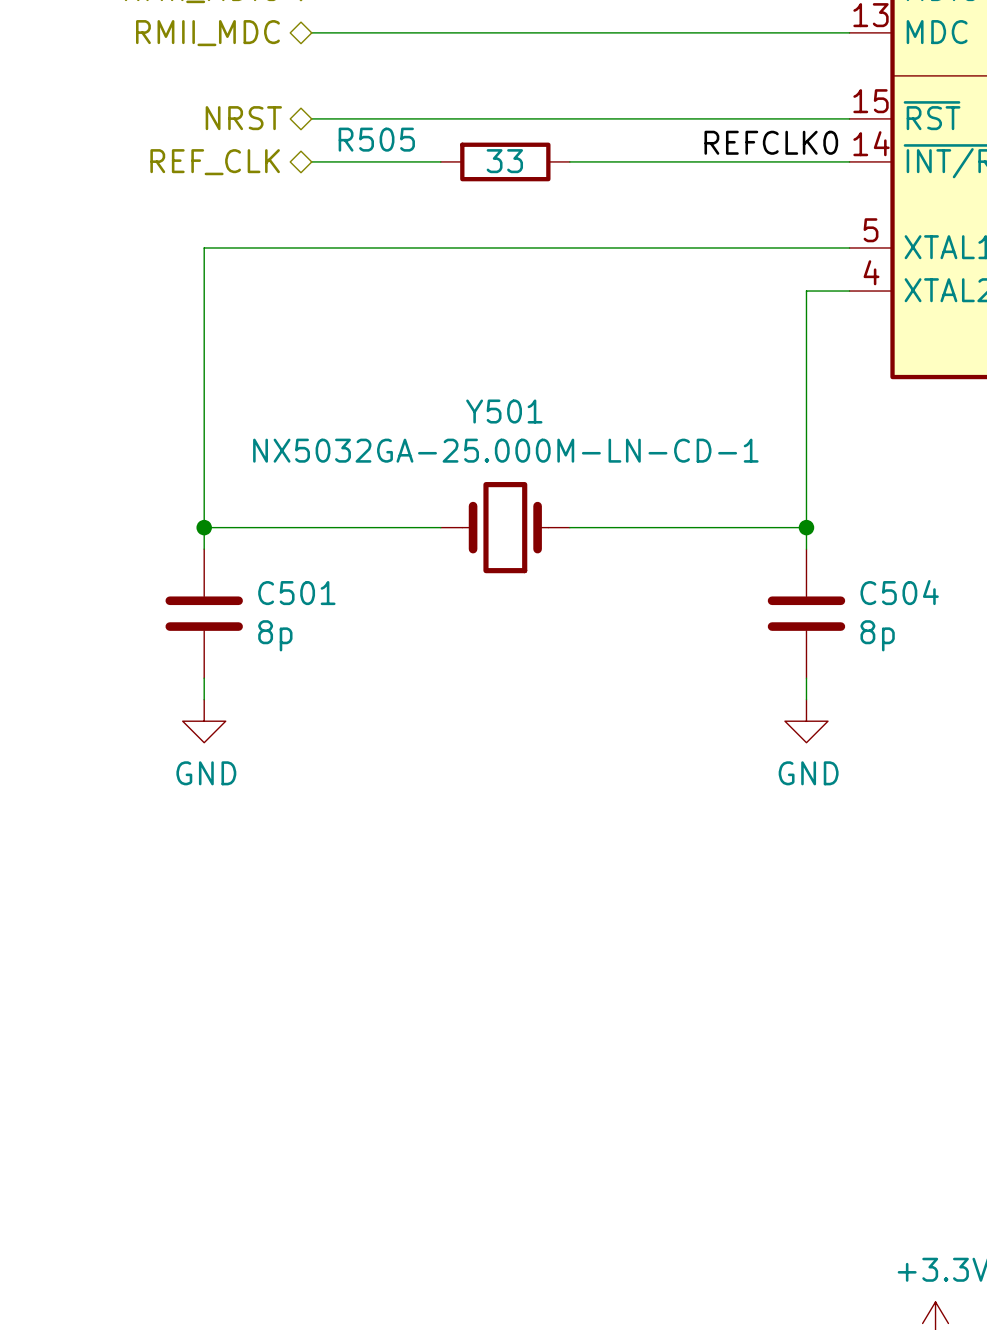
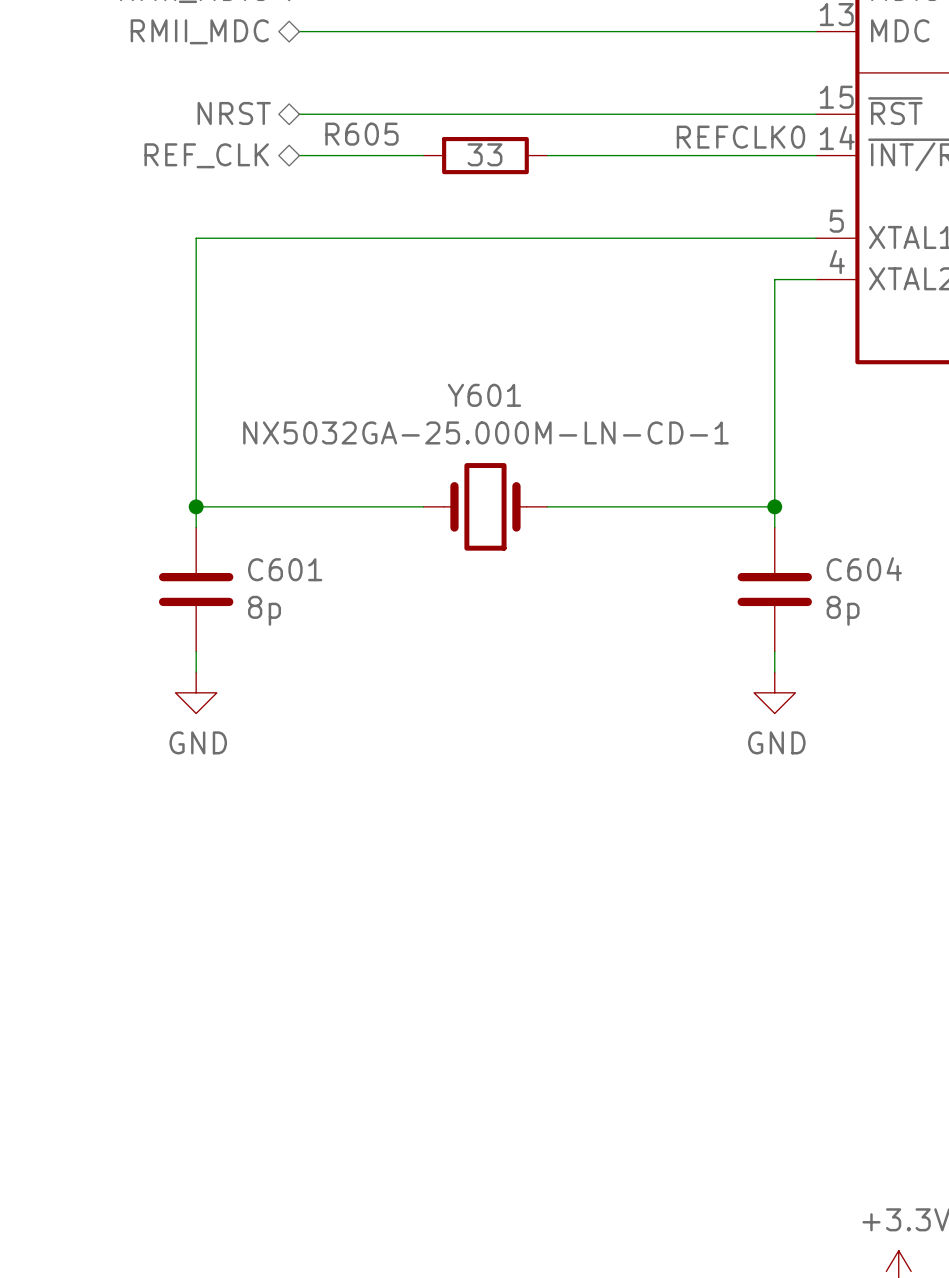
R505 name: R505 (376, 139) -> R605 (361, 134)
Y501 name: Y501 (504, 411) -> Y601 (484, 395)
C504 name: C504 (899, 592) -> C604 (864, 569)
C501 name: C501 (296, 593) -> C601 (285, 569)

